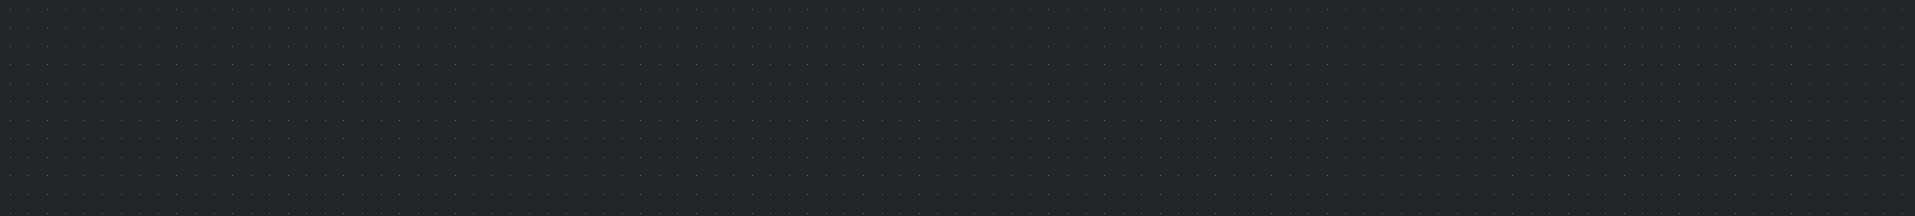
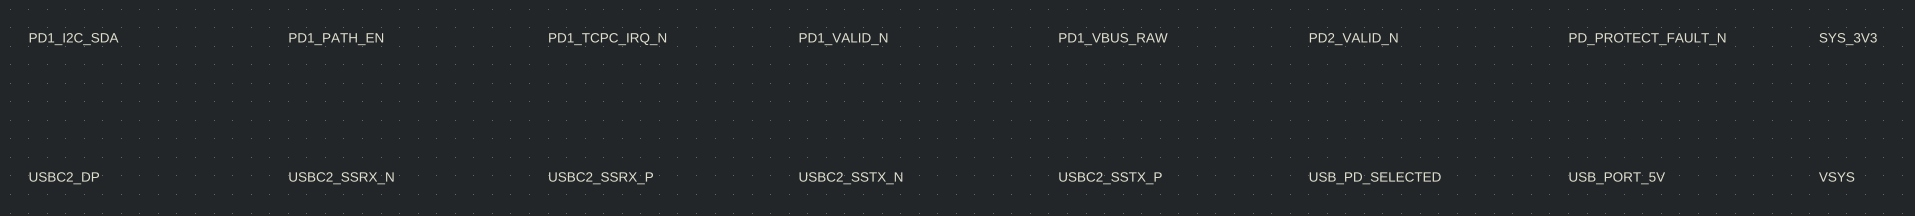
label: none -> PD1_I2C_SDA (74, 39)
label: none -> PD1_PATH_EN (336, 39)
label: none -> PD1_TCPC_IRQ_N (607, 39)
label: none -> PD1_VALID_N (843, 39)
label: none -> PD1_VBUS_RAW (1113, 39)
label: none -> PD2_VALID_N (1353, 39)
label: none -> PD_PROTECT_FAULT_N (1647, 39)
label: none -> SYS_3V3 (1848, 39)
label: none -> VSYS (1836, 176)
label: none -> USBC2_DP (64, 178)
label: none -> USBC2_SSRX_N (341, 178)
label: none -> USBC2_SSRX_P (601, 178)
label: none -> USBC2_SSTX_N (850, 178)
label: none -> USBC2_SSTX_P (1110, 178)
label: none -> USB_PD_SELECTED (1375, 178)
label: none -> USB_PORT_5V (1617, 178)

